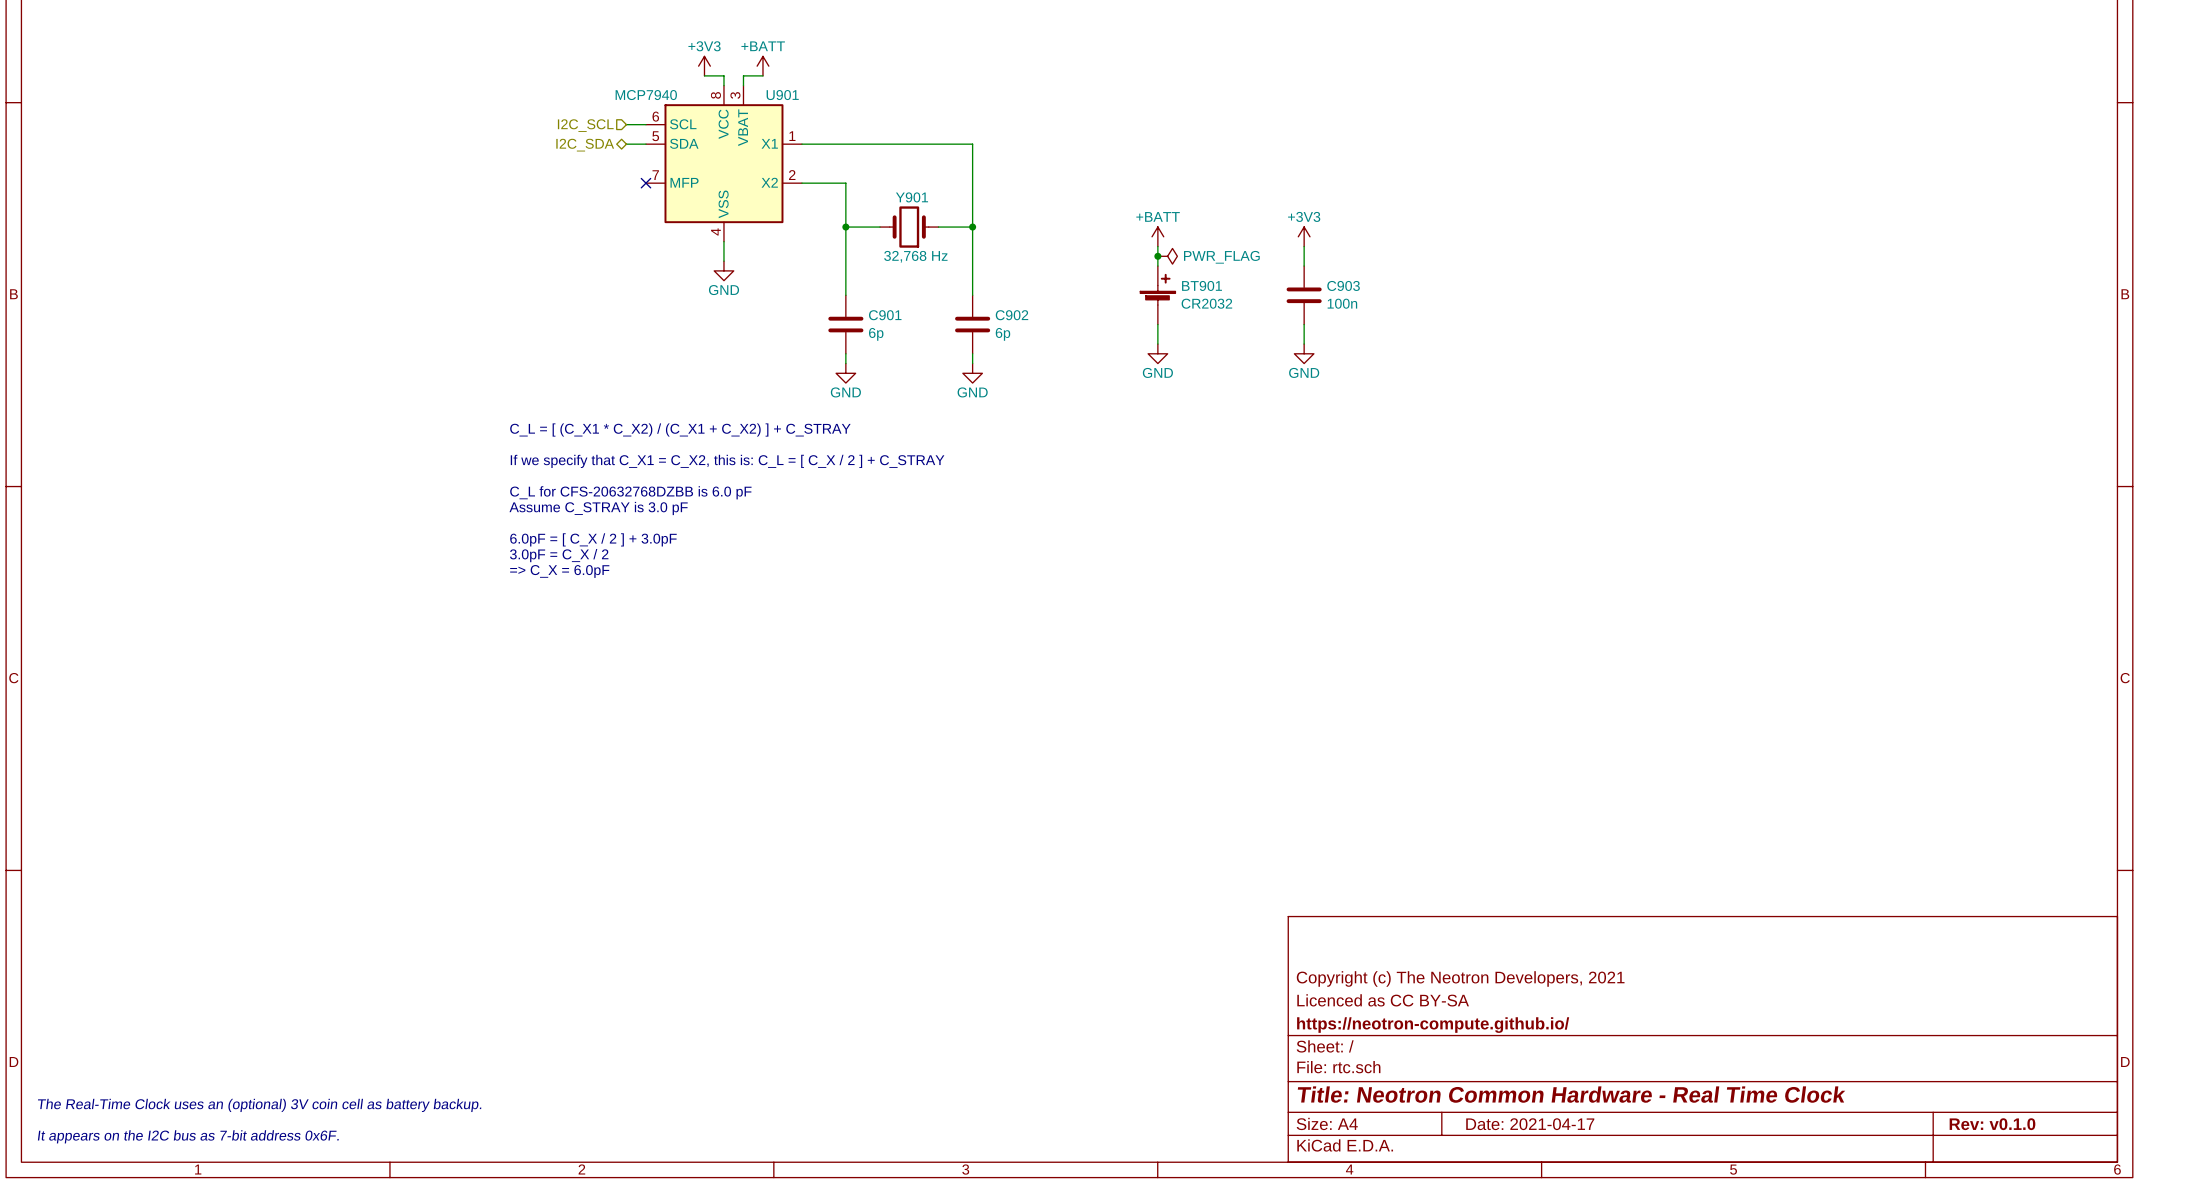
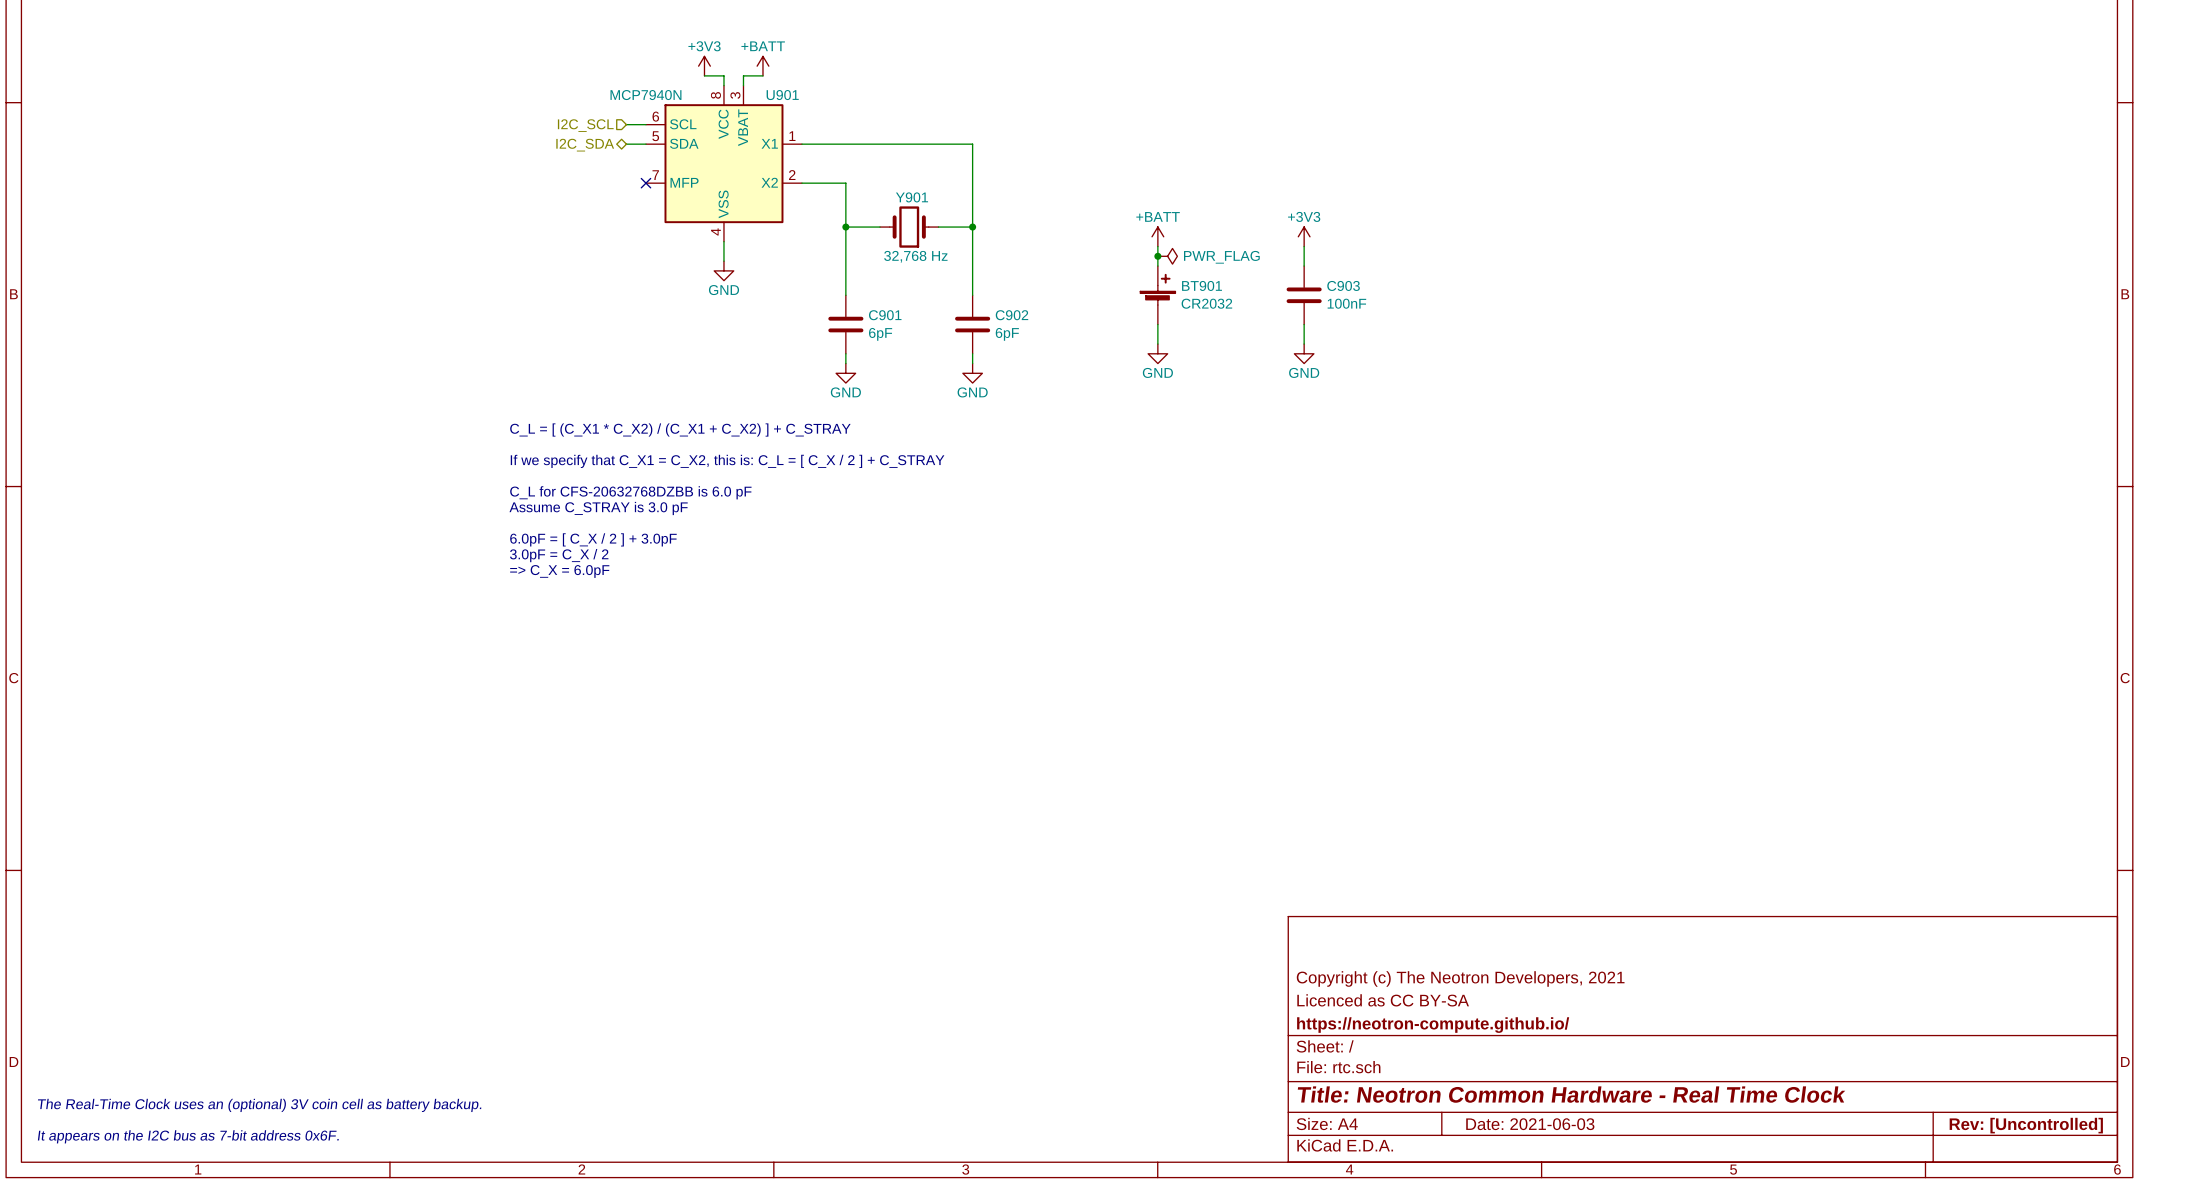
U901 value: MCP7940 (646, 95) -> MCP7940N (645, 95)
C903 value: 100n (1342, 303) -> 100nF (1346, 303)
C901 value: 6p (876, 334) -> 6pF (880, 334)
C902 value: 6p (1002, 334) -> 6pF (1007, 334)
title block: Date: 2021-04-17 (1530, 1124) -> Date: 2021-06-03 (1530, 1124)
title block: Rev: v0.1.0 (1992, 1124) -> Rev: [Uncontrolled] (2026, 1125)

